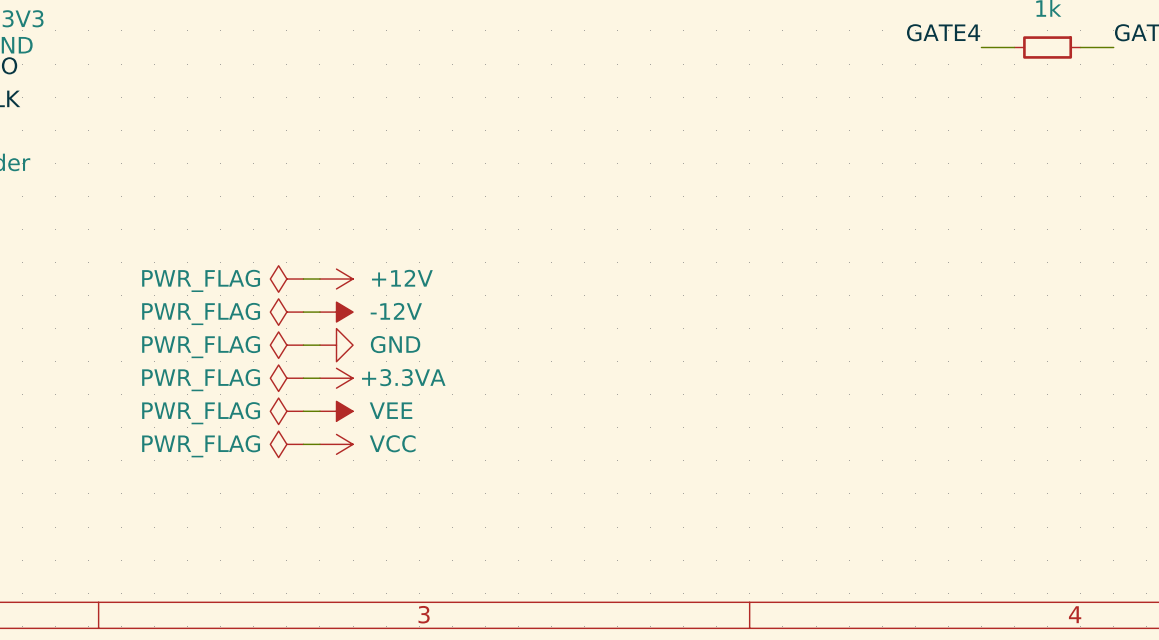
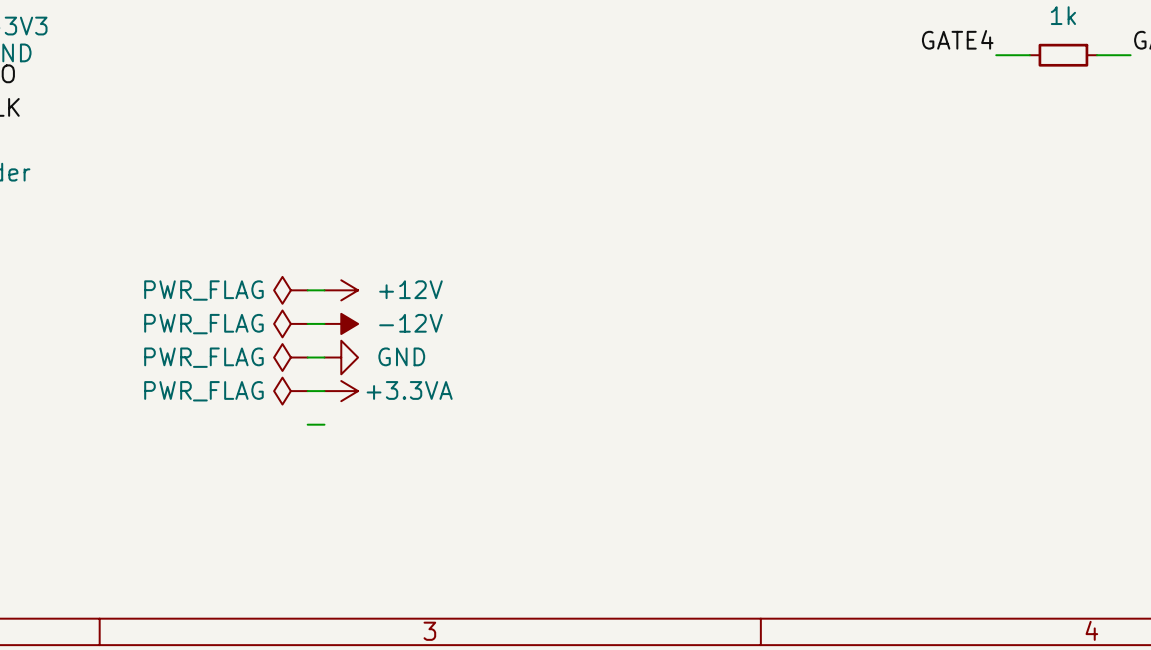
power symbol: PWR_FLAG (286, 411) -> none
power symbol: VEE (336, 411) -> none
power symbol: PWR_FLAG (286, 444) -> none
wire: (303, 444) (319, 444) -> none
power symbol: VCC (336, 444) -> none

